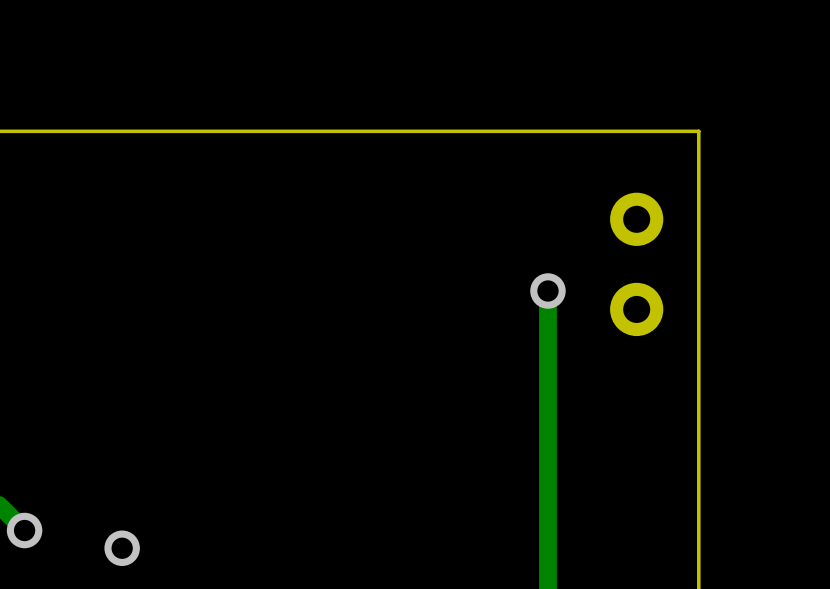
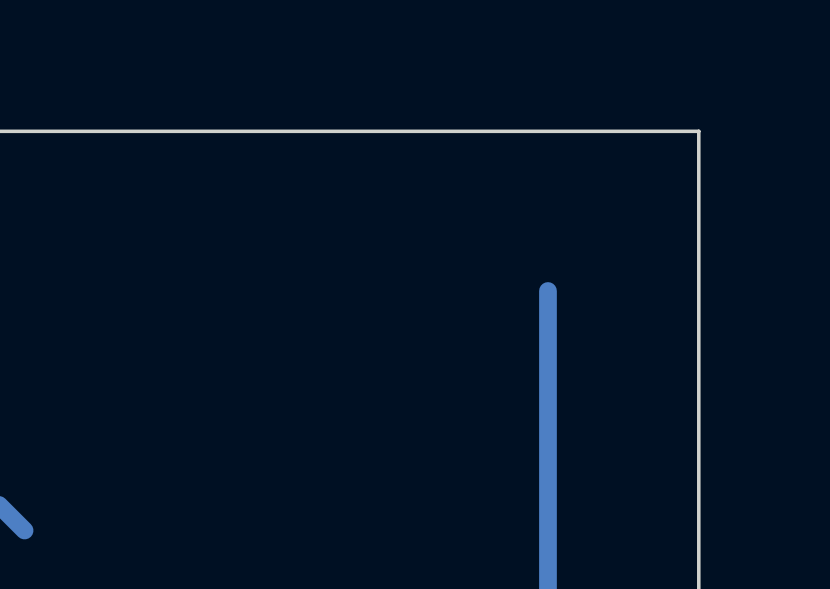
part: (636, 264) -> none
via: (547, 290) -> none
via: (24, 530) -> none
via: (122, 548) -> none

